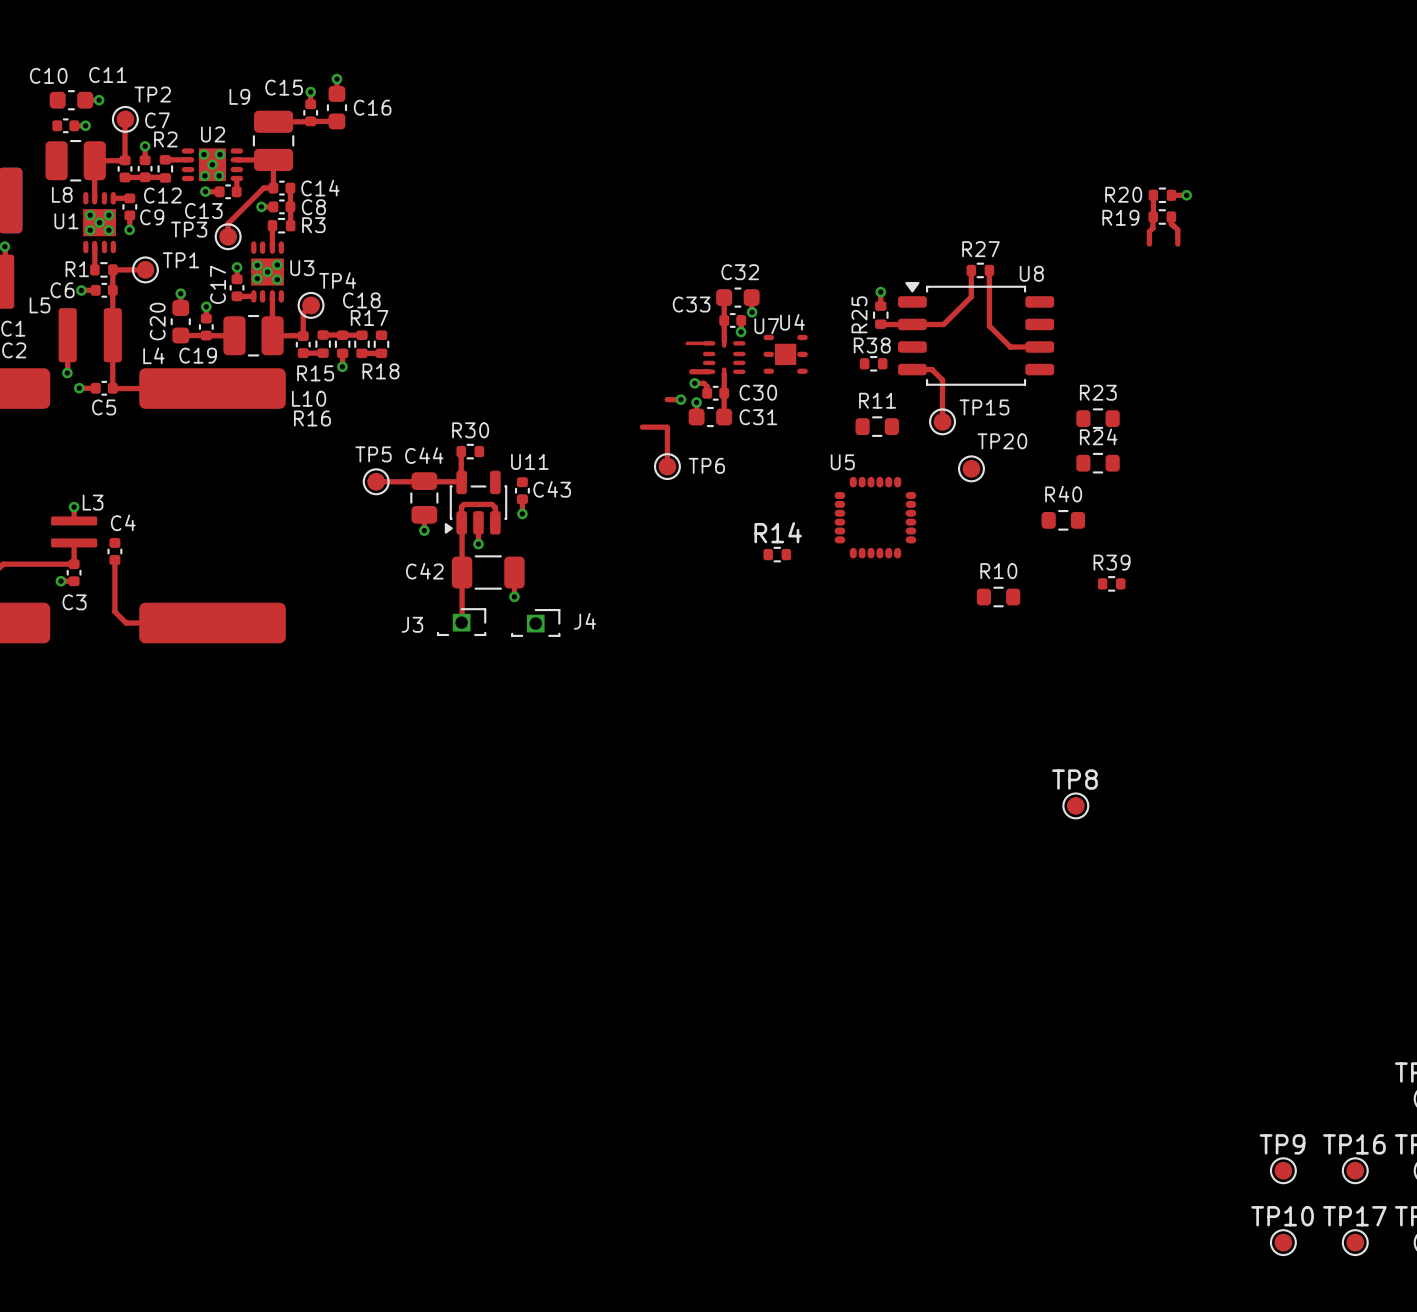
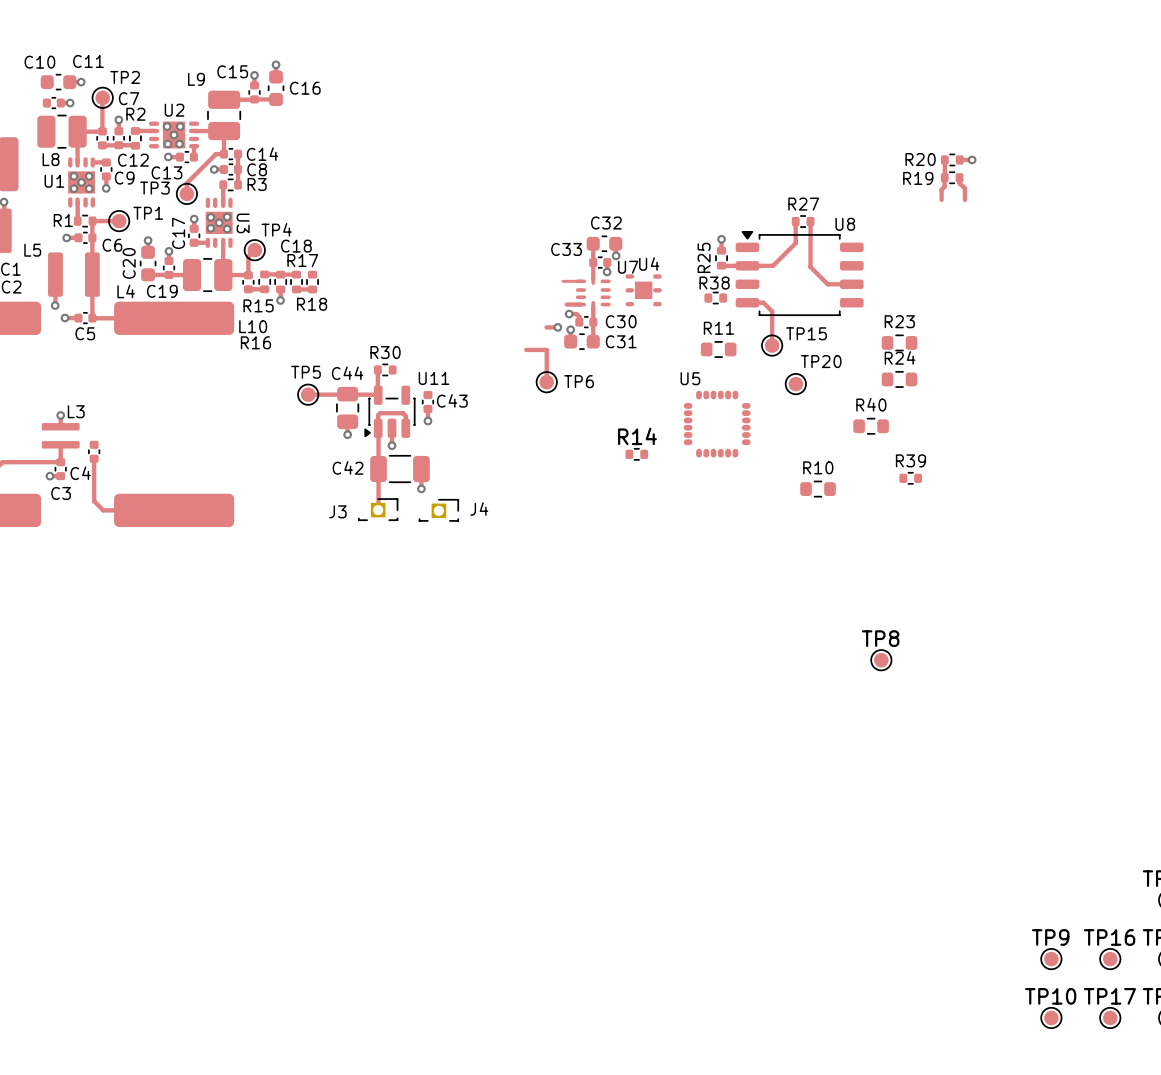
U3 name rotation: 0° (302, 268) -> 90° clockwise (243, 223)
C6 name position: C6 (62, 290) -> C6 (112, 245)
C4 name position: C4 (123, 522) -> C4 (80, 473)

